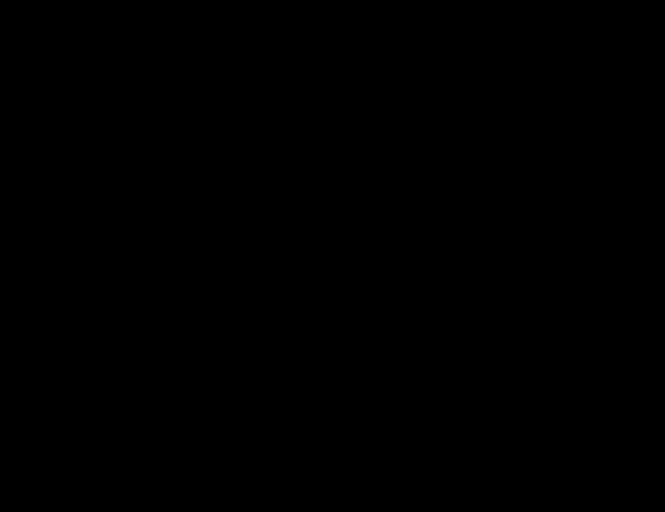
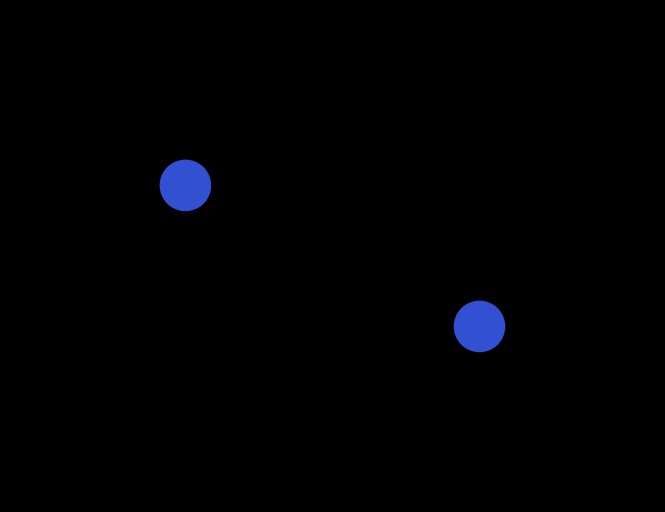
part: none -> (185, 185)
part: none -> (479, 326)

